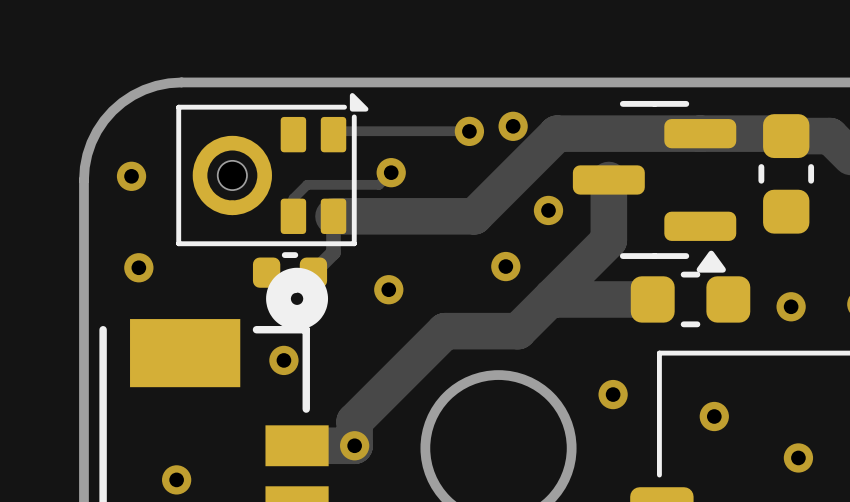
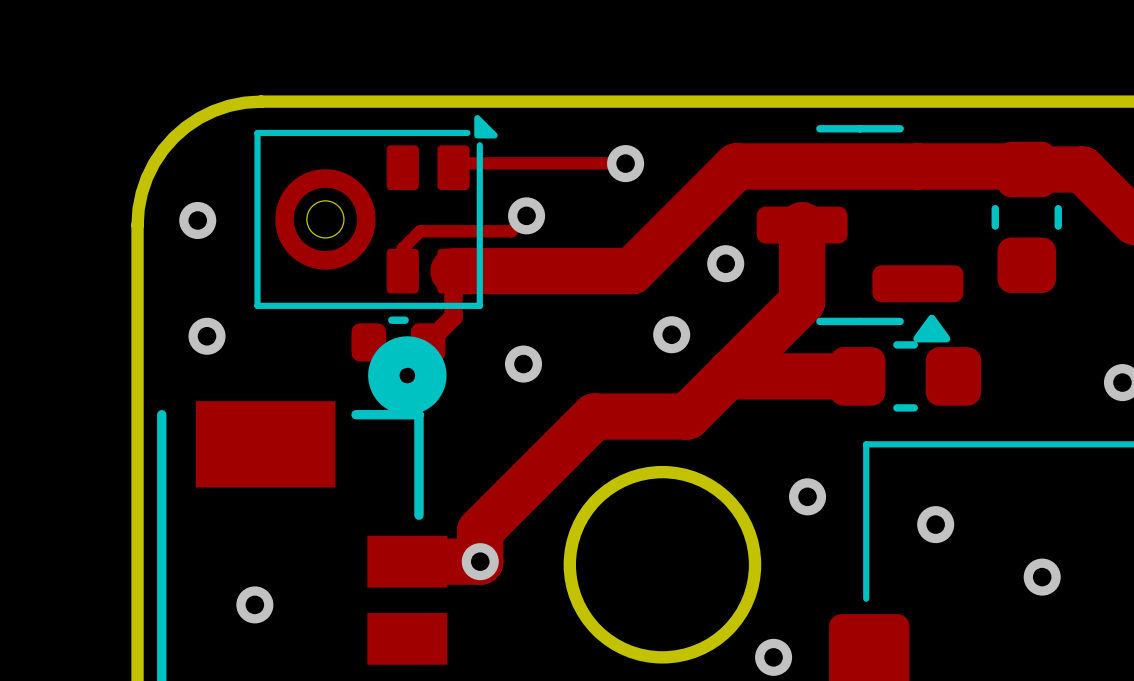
via: (513, 126) -> none
via: (791, 306) -> none
via: (283, 360) -> none

